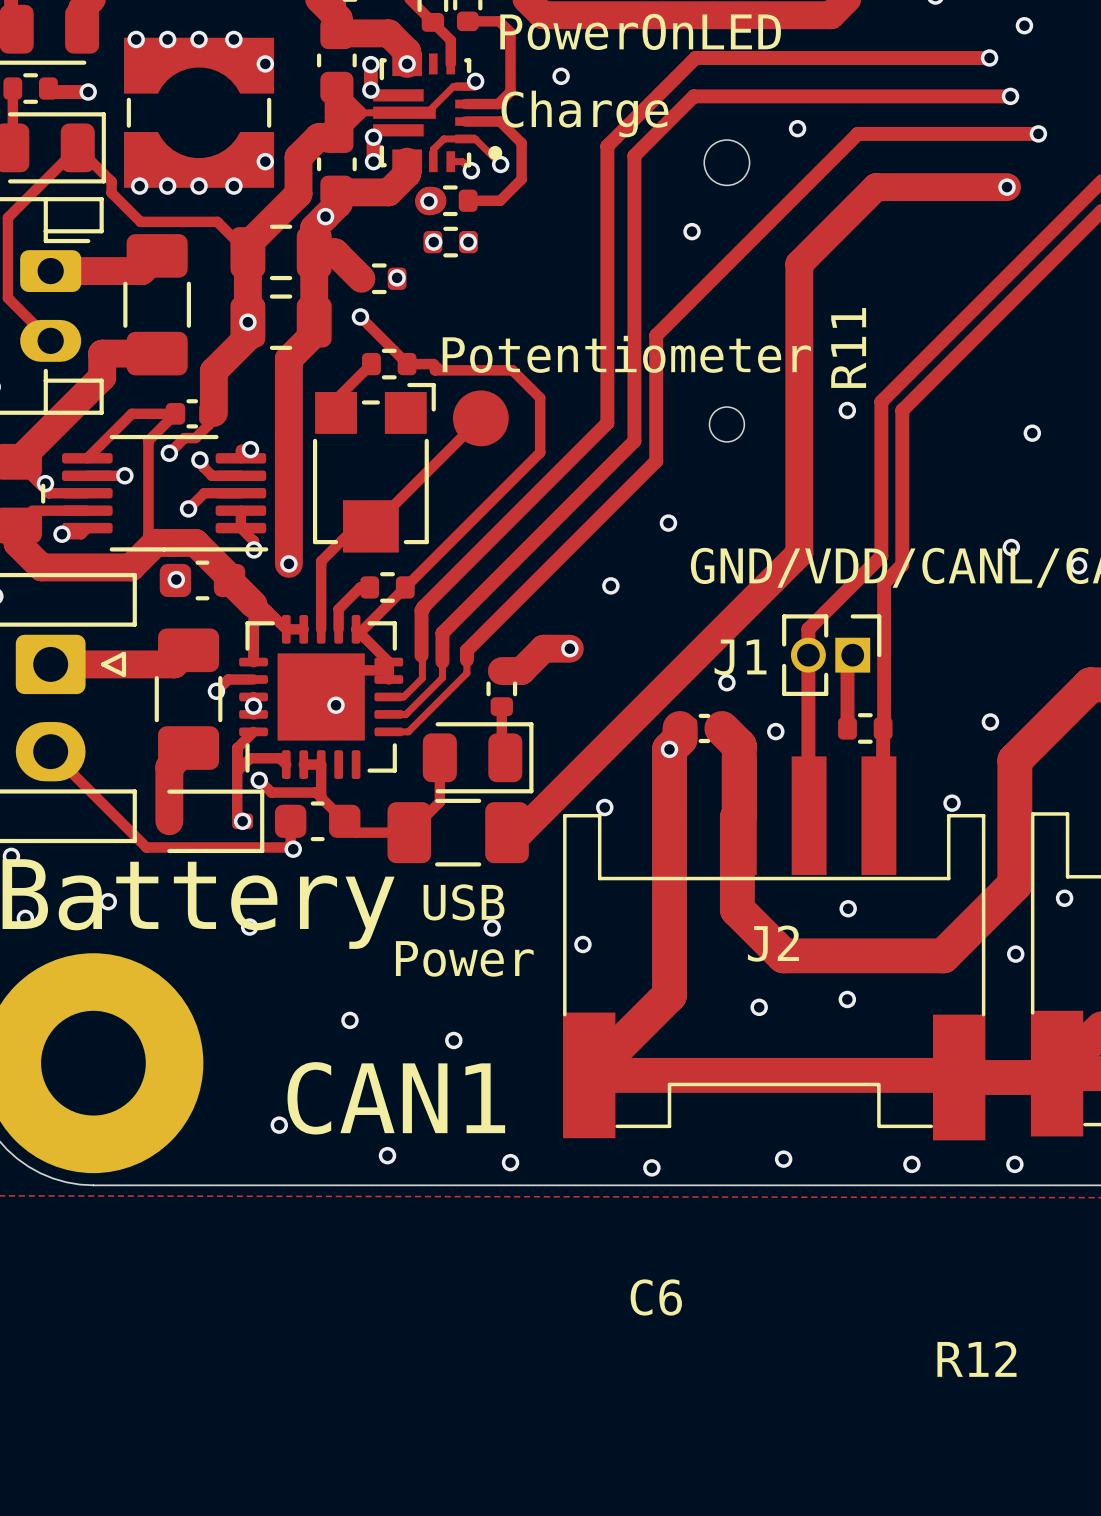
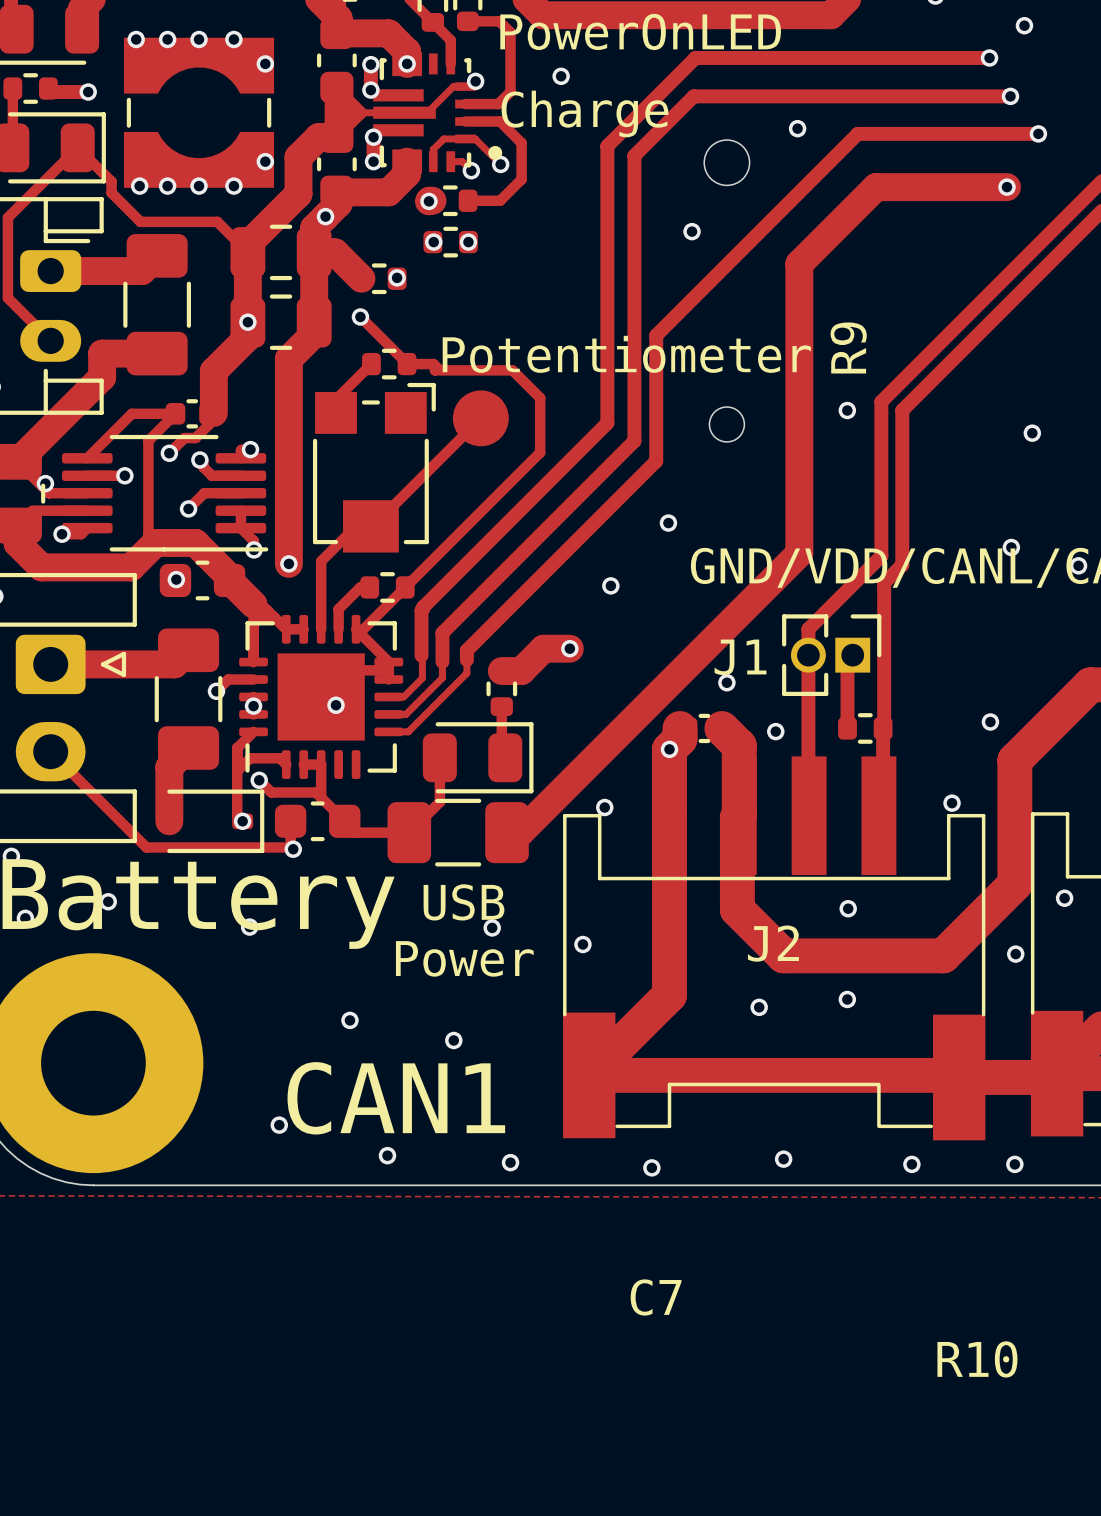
R11 name: R11 (848, 347) -> R9 (848, 347)
C6 name: C6 (656, 1297) -> C7 (656, 1297)
R12 name: R12 (976, 1359) -> R10 (977, 1359)

